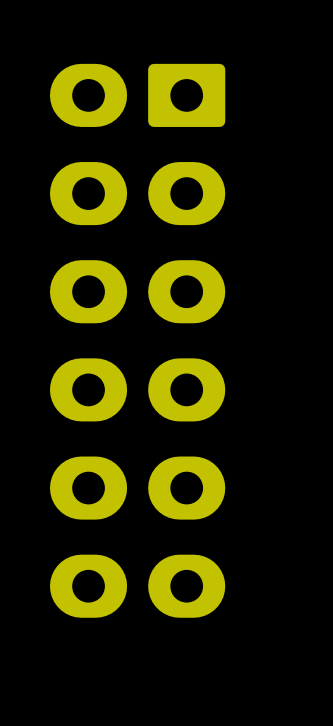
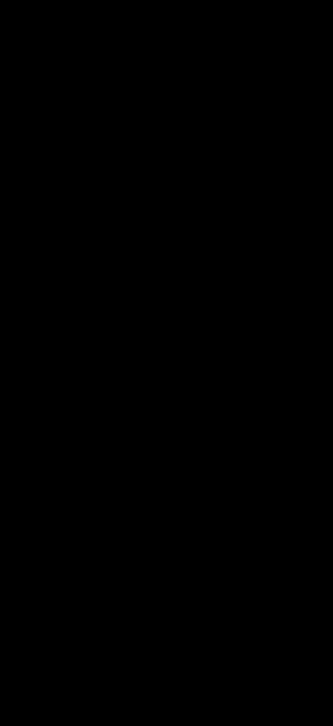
part: (137, 340) -> none

